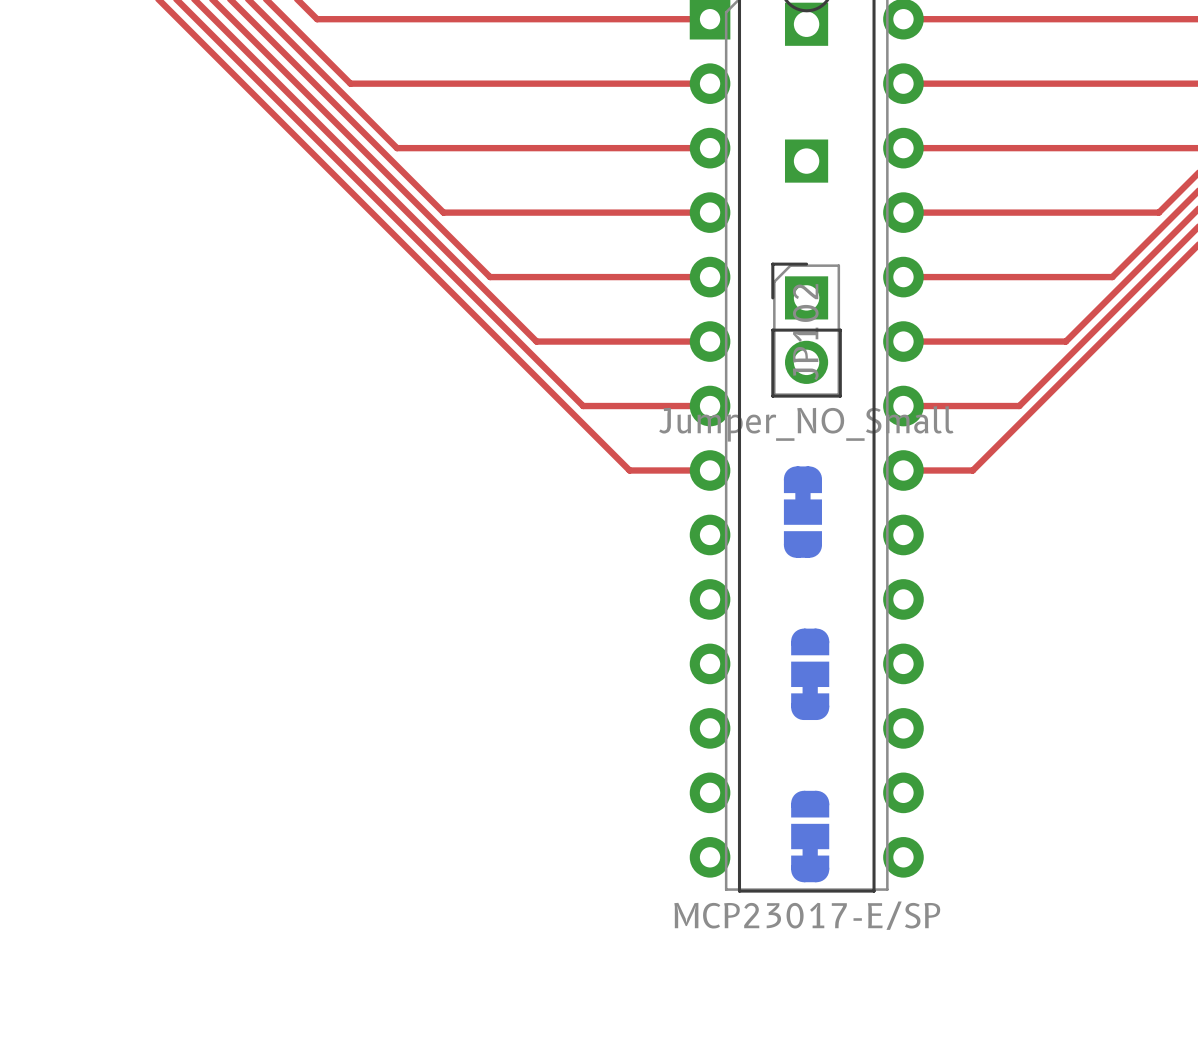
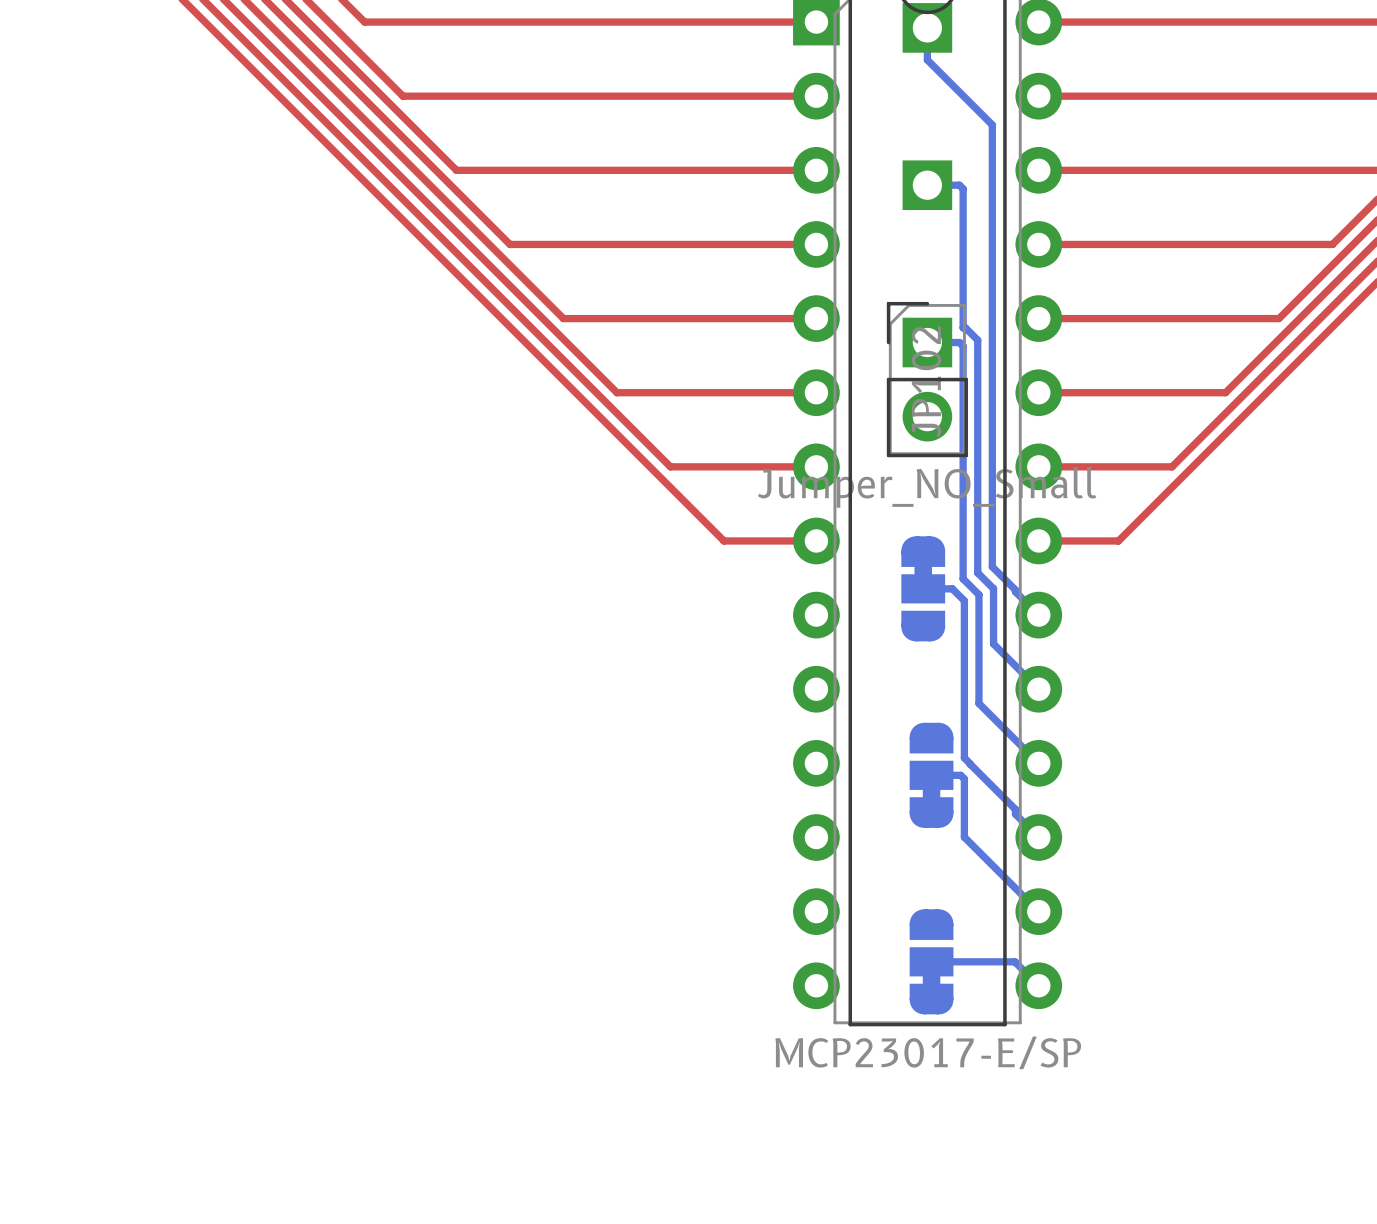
bottom track: none -> (927, 27) (927, 60) (992, 124) (992, 566) (1038, 615)
bottom track: none -> (927, 185) (959, 185) (963, 188) (963, 327) (965, 327) (977, 340) (977, 572) (993, 588) (993, 644) (1038, 689)
bottom track: none -> (927, 342) (959, 342) (963, 346) (963, 578) (978, 594) (978, 703) (1038, 763)
bottom track: none -> (923, 588) (952, 588) (964, 600) (964, 757) (970, 763)
bottom track: none -> (970, 764) (1015, 809) (1015, 814) (1038, 837)
bottom track: none -> (931, 775) (960, 775) (964, 778) (964, 837) (1038, 911)
bottom track: none -> (931, 961) (1014, 961) (1038, 985)

